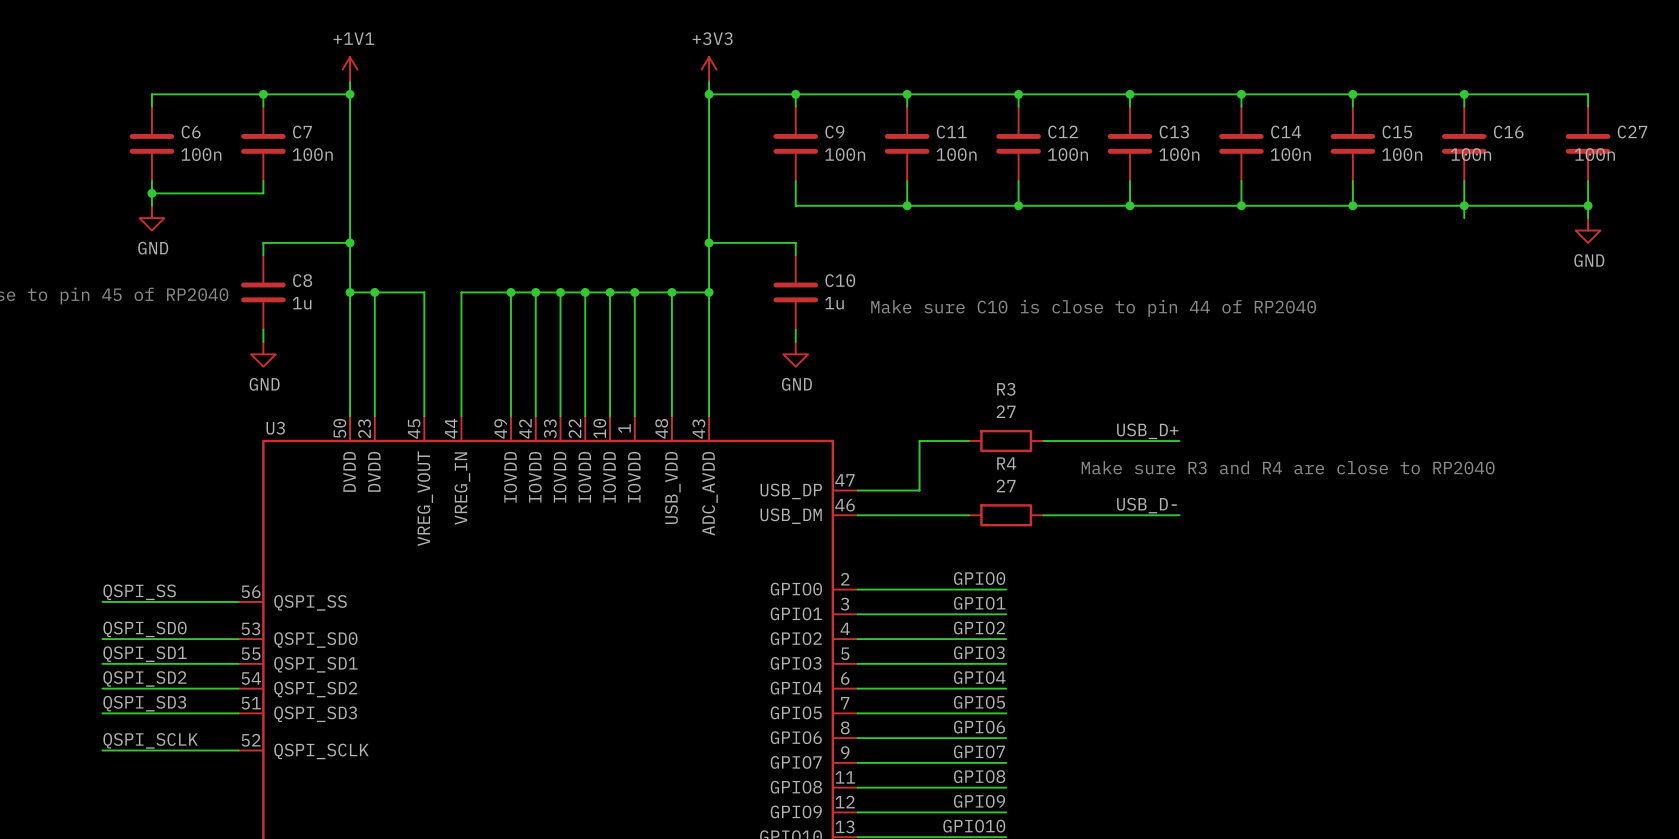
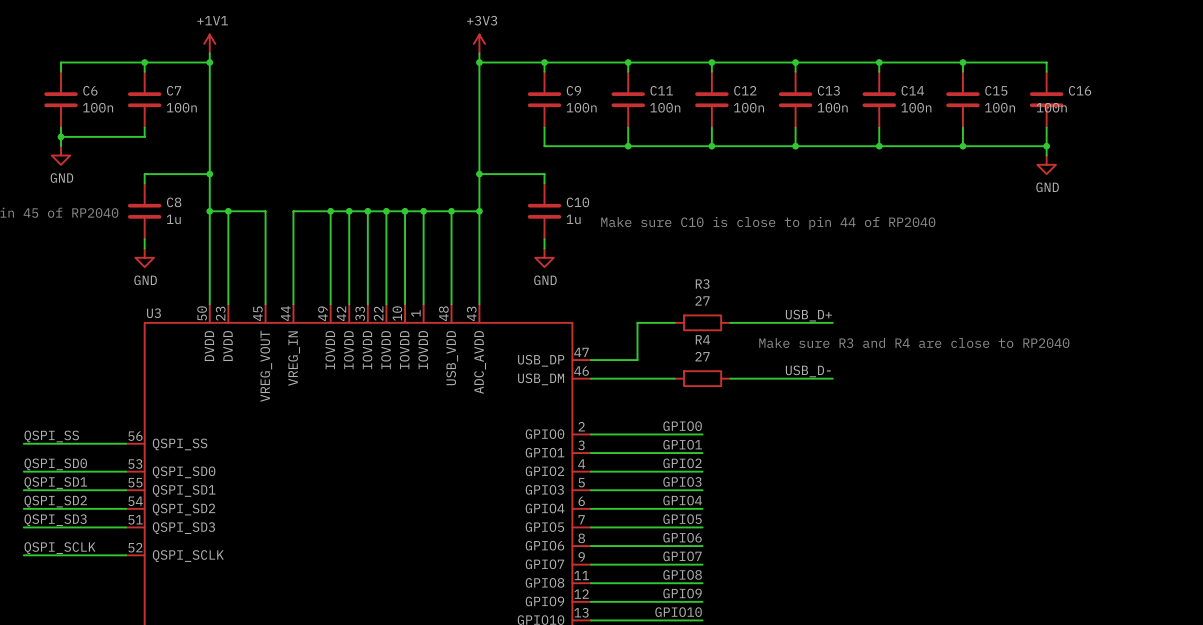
wire: (1464, 94) (1588, 94) (1588, 106) -> none
junction: (1464, 94) -> none
C27: 100n (1588, 143) -> none
wire: (1588, 181) (1588, 218) -> none
wire: (1464, 205) (1588, 205) -> none
junction: (1588, 205) -> none
power symbol position: GND (1588, 230) -> GND (1046, 164)

